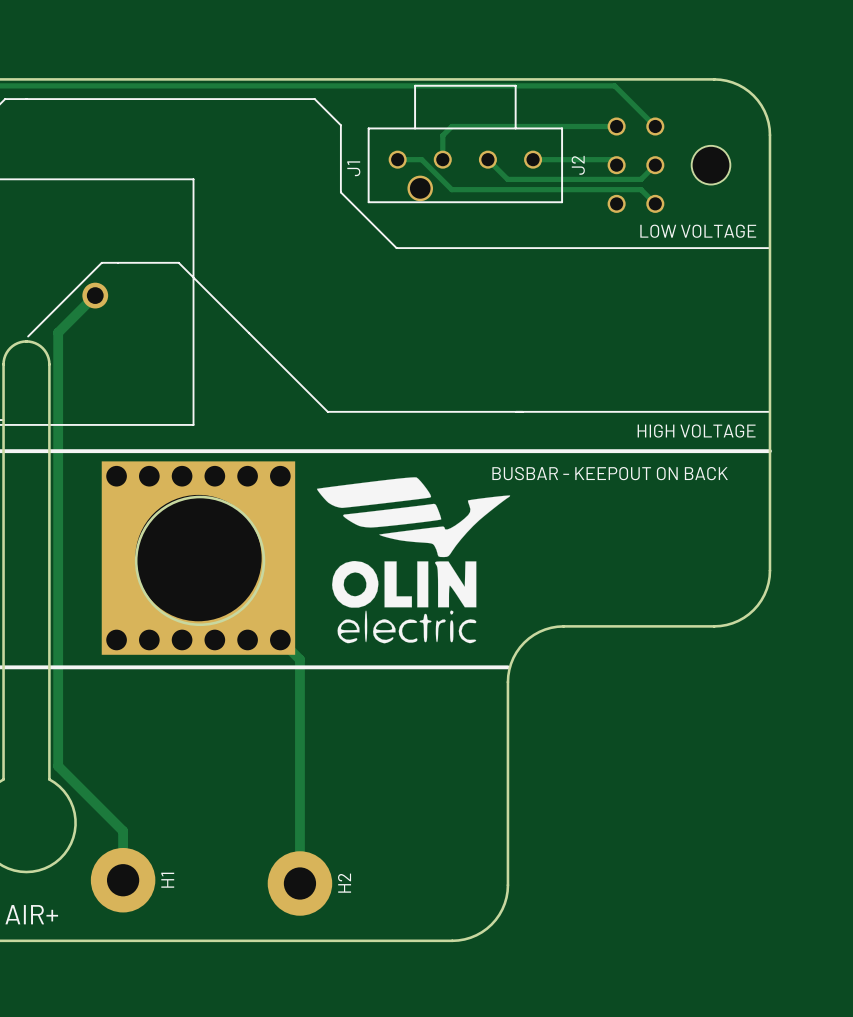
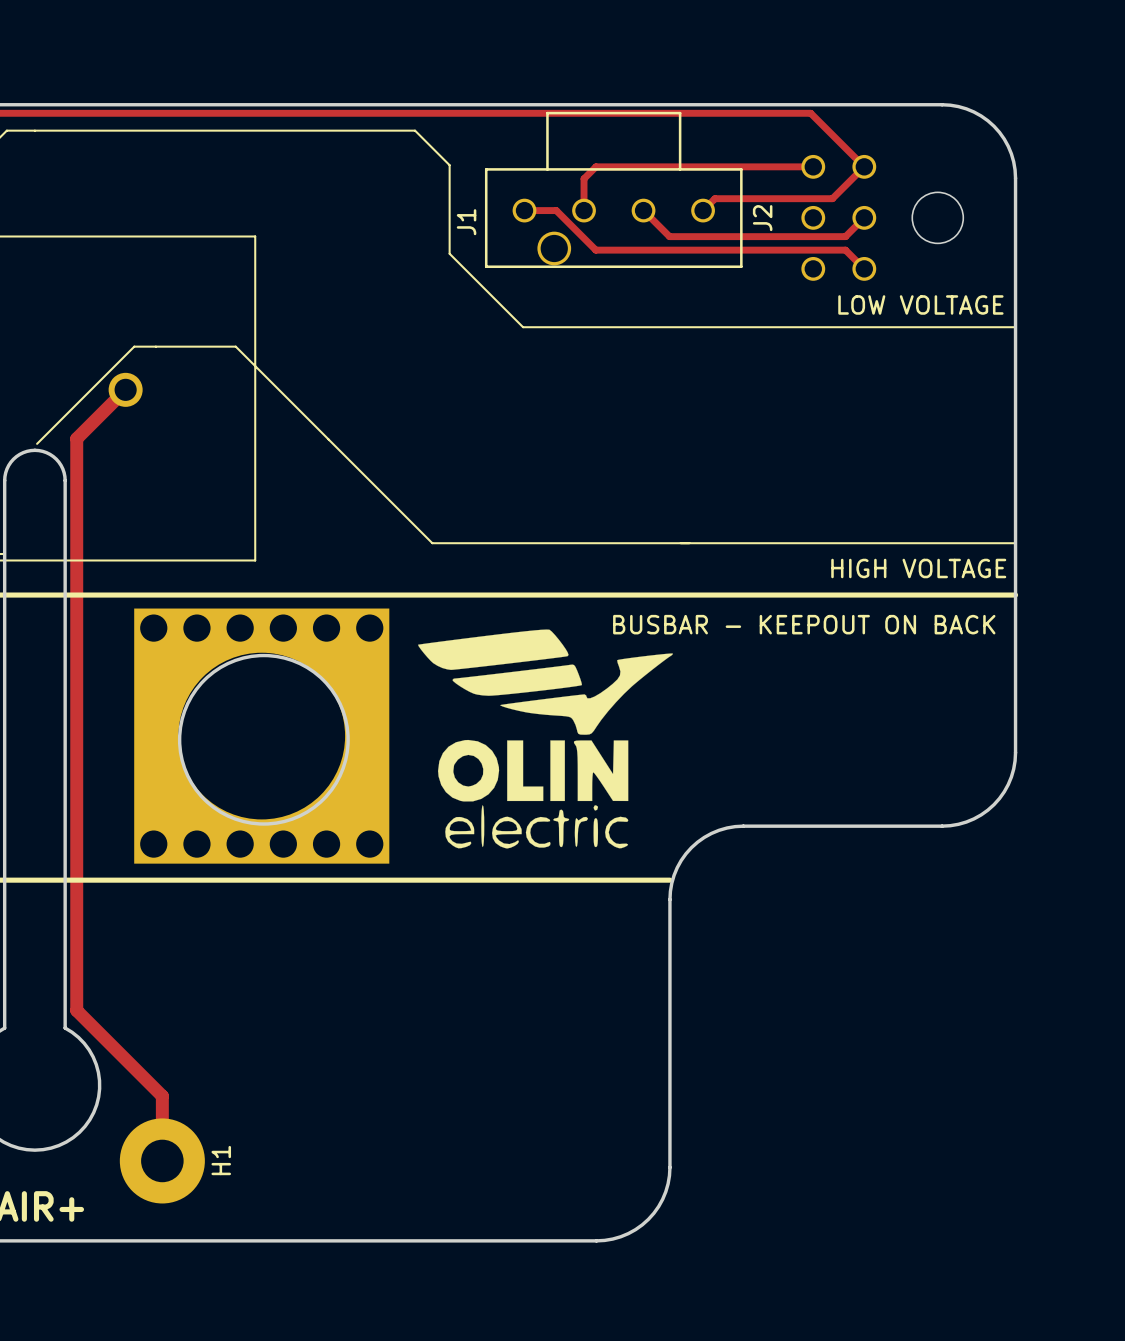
track: (533, 159) (611, 159) (616, 165) -> (703, 210) (714, 198) (832, 198) (864, 166)
track: (280, 639) (299, 659) (299, 883) -> none
H2: (299, 883) -> none

